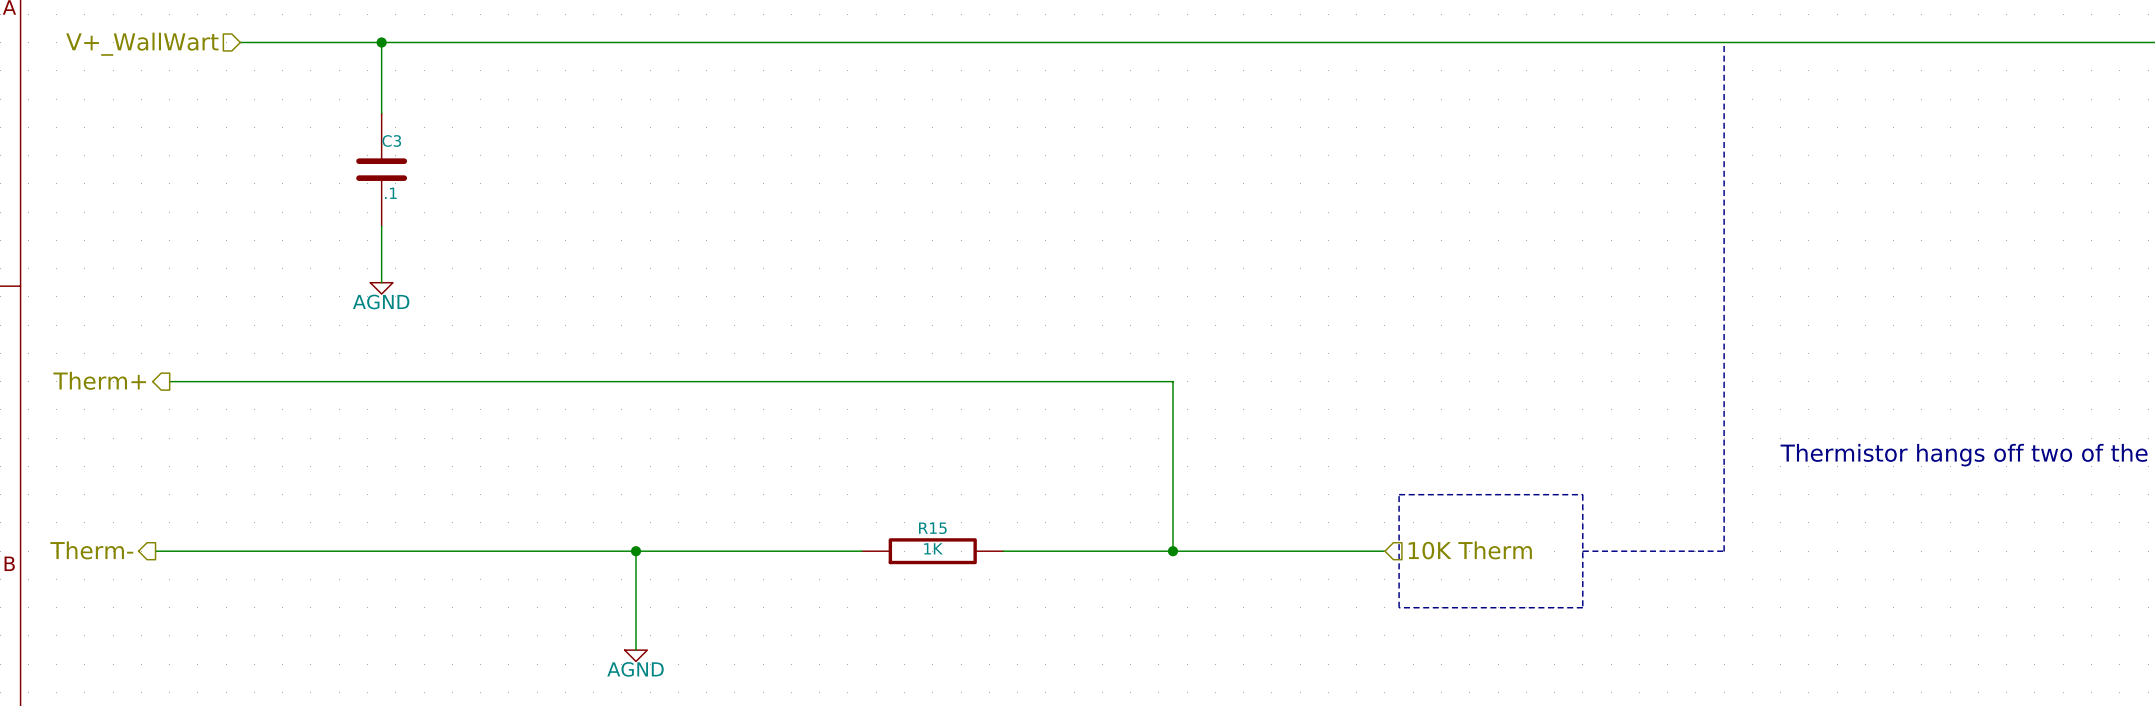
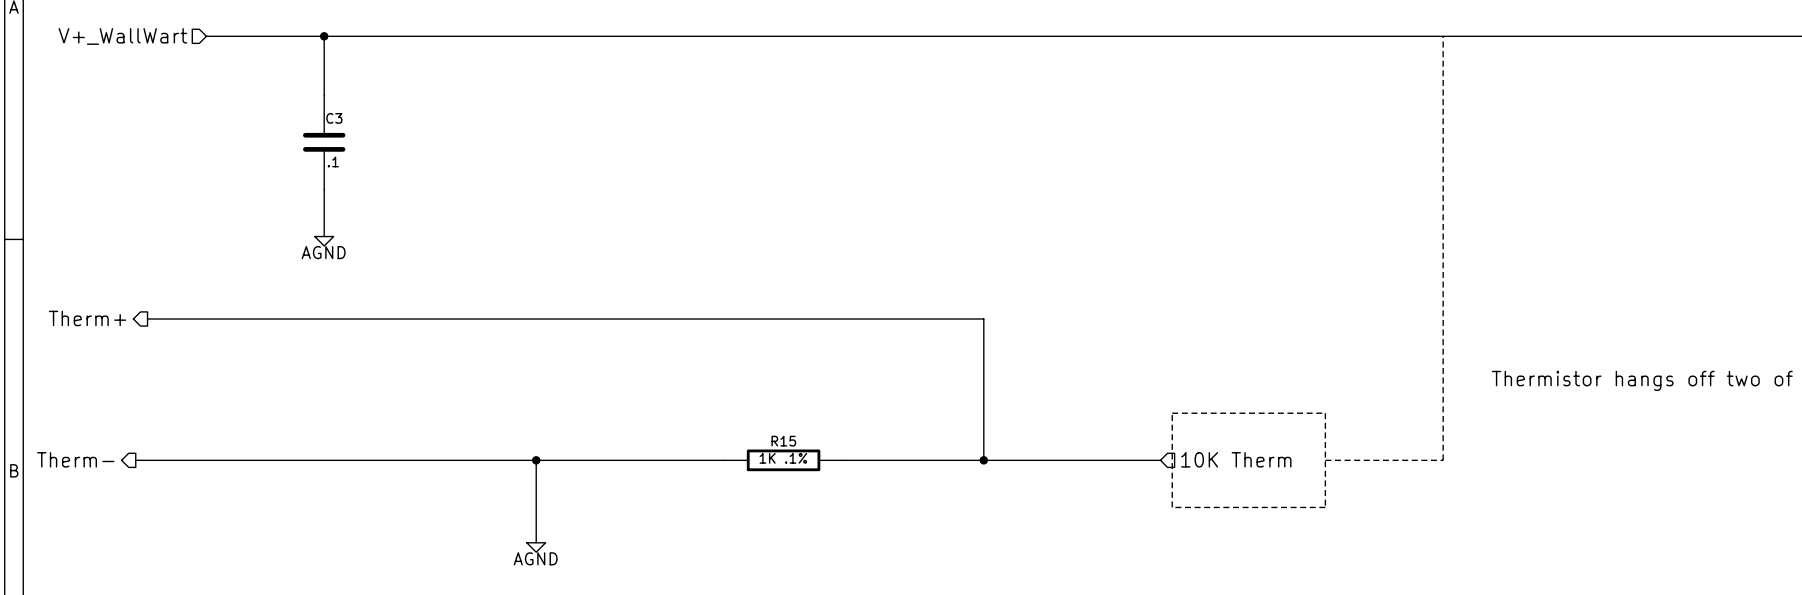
R15 value: 1K (933, 548) -> 1K .1% (783, 458)

